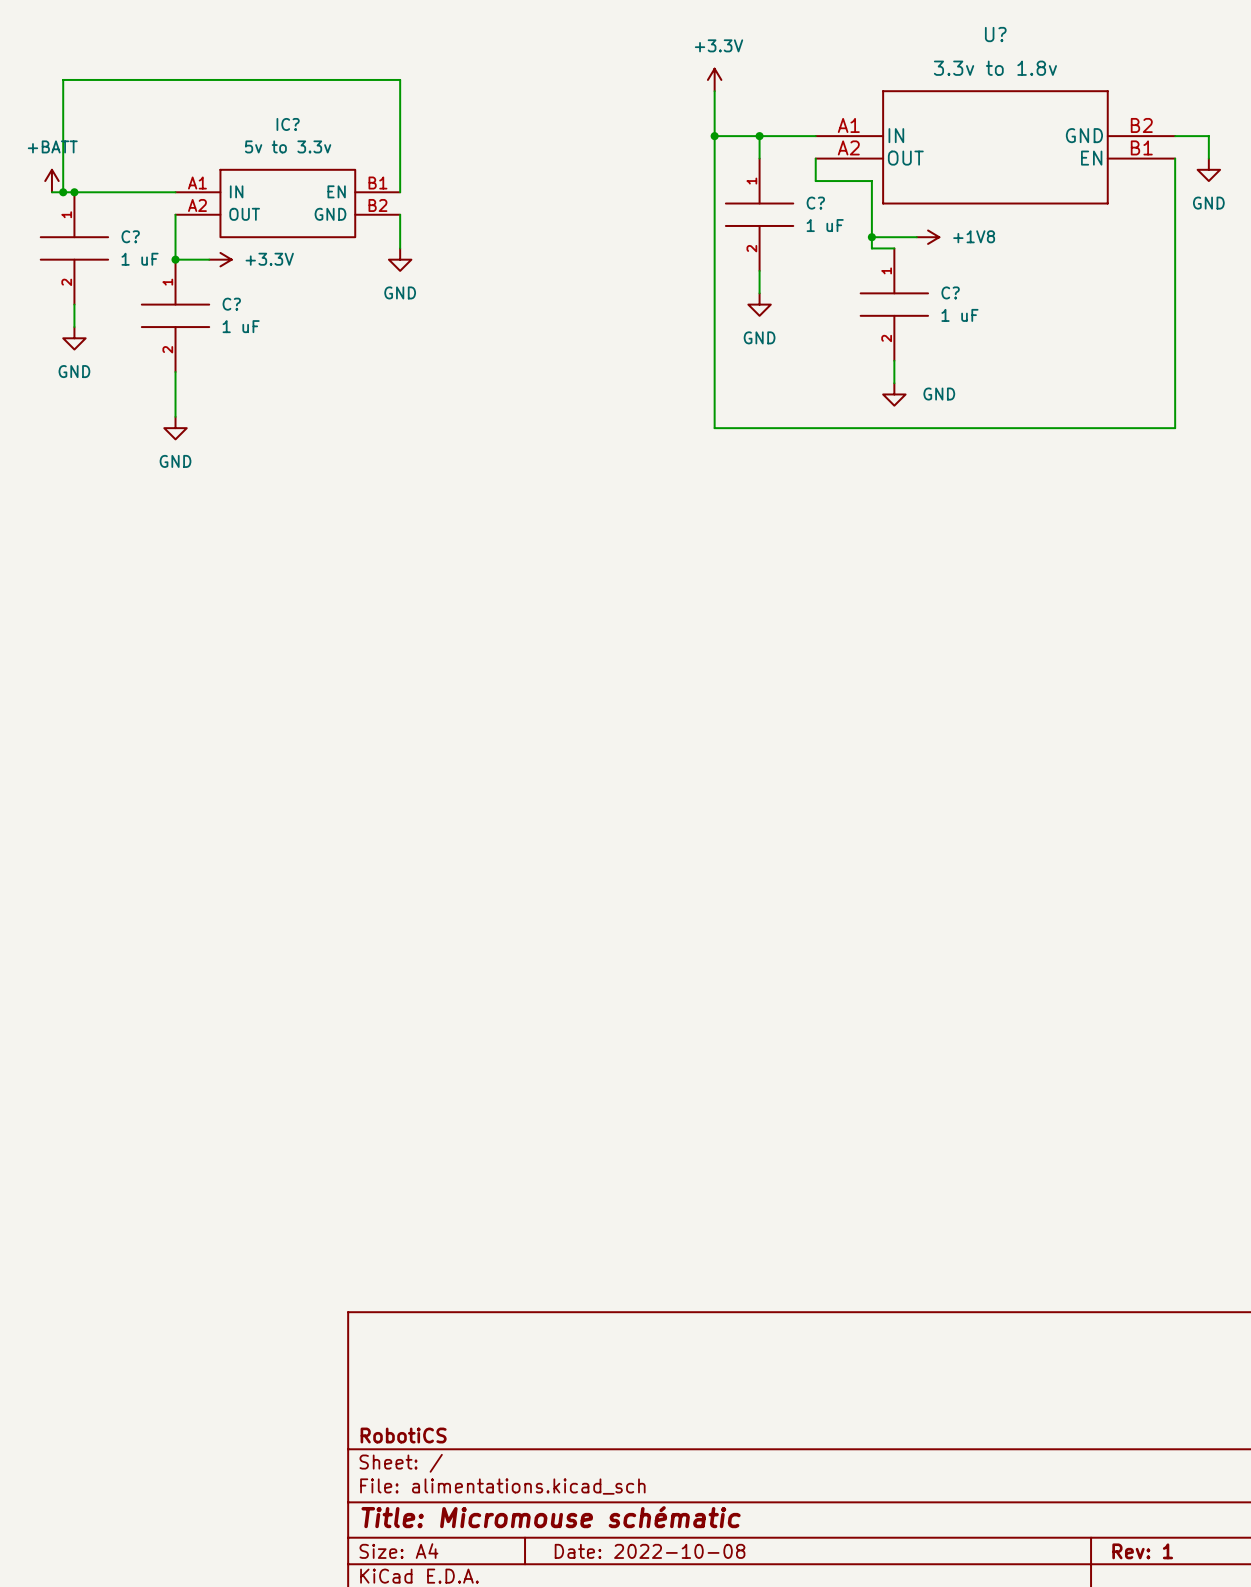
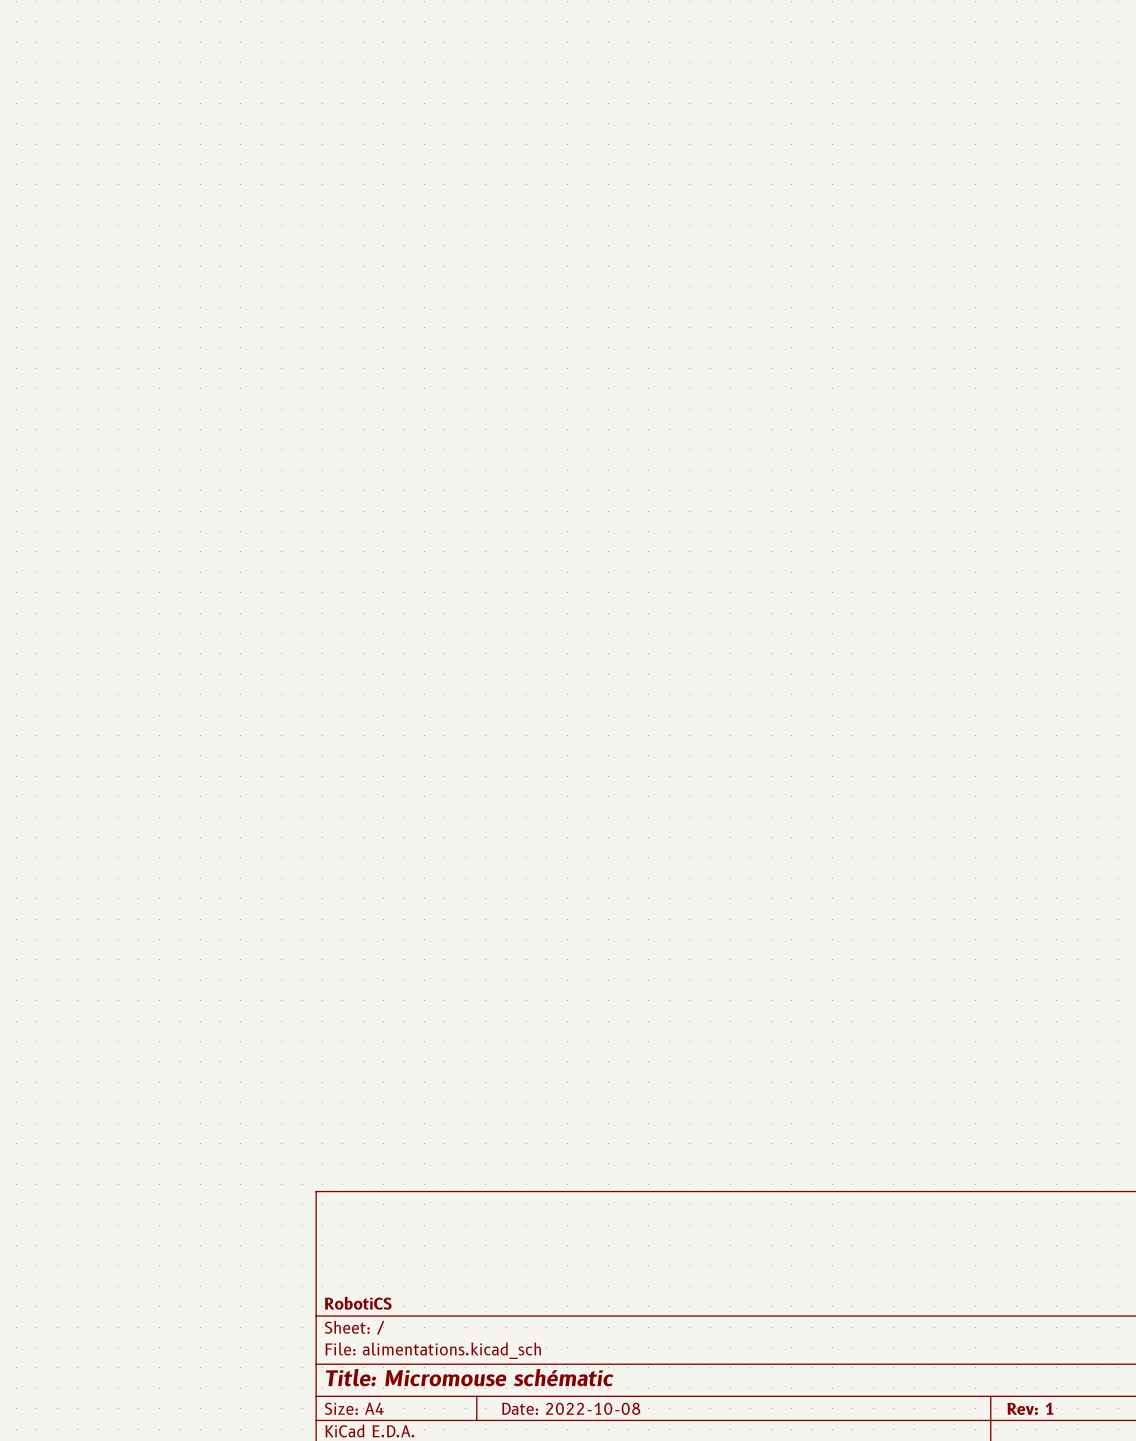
power symbol: +3.3V (714, 79) -> none
wire: (714, 91) (714, 428) (1175, 428) (1175, 158) -> none
wire: (714, 136) (815, 136) -> none
junction: (714, 136) -> none
wire: (759, 136) (759, 158) -> none
junction: (759, 136) -> none
wire: (1175, 136) (1208, 136) (1208, 158) -> none
U?: 3.3v to 1.8v (995, 147) -> none
wire: (815, 158) (815, 181) (871, 181) (871, 248) (894, 248) -> none
power symbol: GND (1208, 169) -> none
power symbol: +BATT (51, 181) -> none
wire: (51, 192) (175, 192) -> none
wire: (63, 192) (63, 79) (400, 79) (400, 192) -> none
junction: (63, 192) -> none
junction: (74, 192) -> none
IC?: 5v to 3.3v (287, 203) -> none
wire: (175, 214) (175, 259) (209, 259) -> none
wire: (400, 214) (400, 248) -> none
C?: 1 uF (759, 214) -> none
wire: (871, 237) (916, 237) -> none
junction: (871, 237) -> none
power symbol: +1V8 (928, 237) -> none
C?: 1 uF (74, 248) -> none
junction: (175, 259) -> none
power symbol: +3.3V (220, 259) -> none
power symbol: GND (400, 259) -> none
wire: (759, 270) (759, 293) -> none
wire: (74, 304) (74, 327) -> none
power symbol: GND (759, 304) -> none
C?: 1 uF (894, 304) -> none
C?: 1 uF (175, 315) -> none
power symbol: GND (74, 338) -> none
wire: (894, 360) (894, 383) -> none
wire: (175, 371) (175, 416) -> none
power symbol: GND (894, 394) -> none
power symbol: GND (175, 428) -> none

